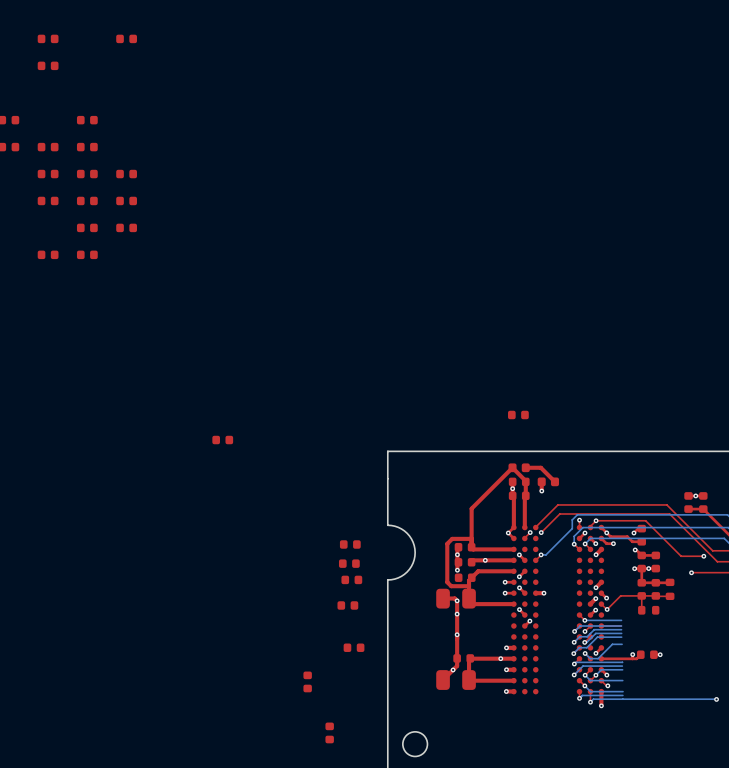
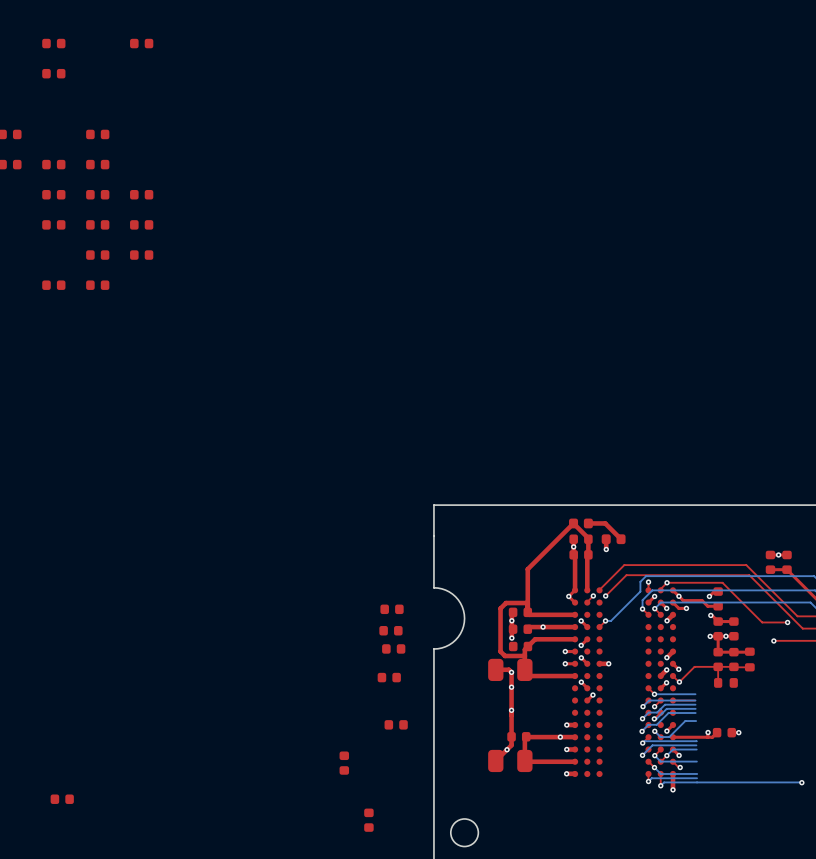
part: (518, 414) -> none
part: (222, 440) -> none
part: none -> (62, 799)

